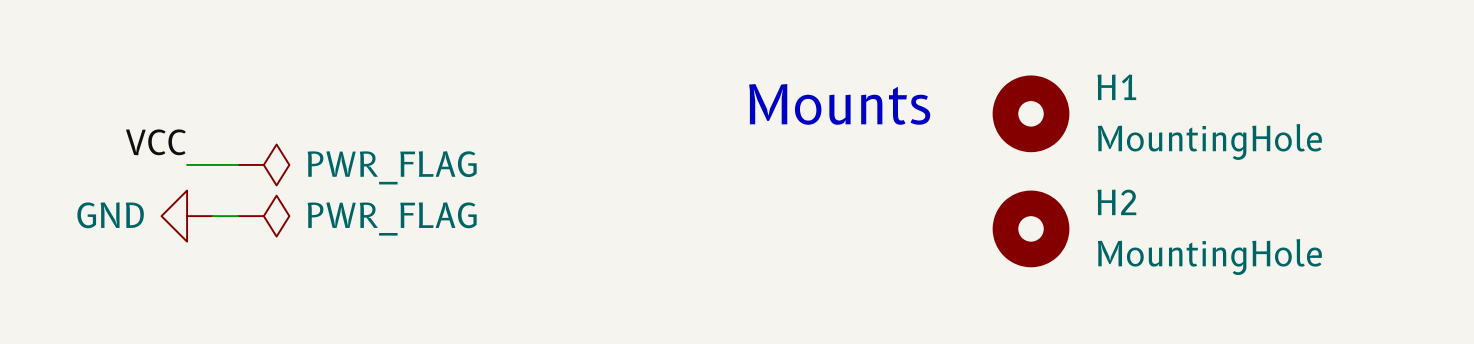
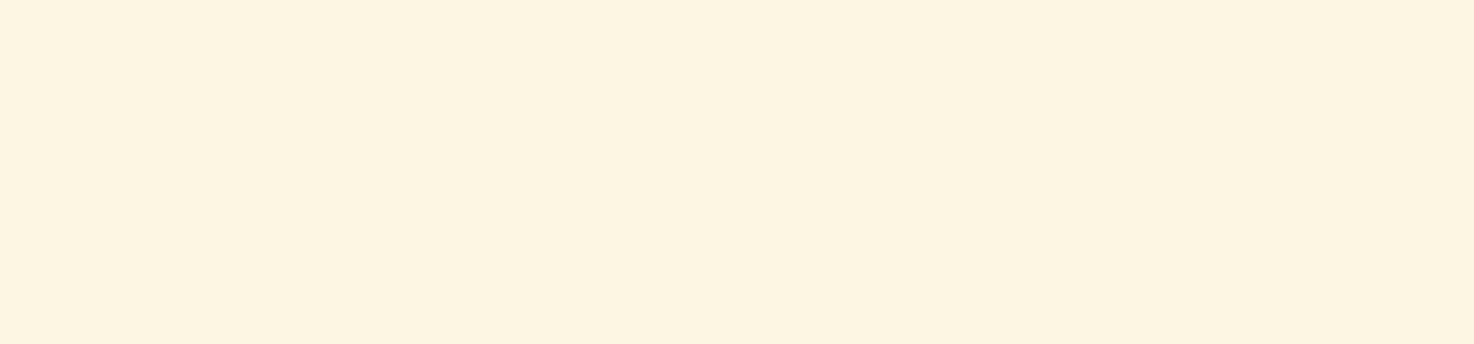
text: Mounts (839, 104) -> none
H1: MountingHole (1031, 113) -> none
label: VCC (155, 142) -> none
wire: (187, 164) (238, 164) -> none
power symbol: PWR_FLAG (263, 164) -> none
power symbol: GND (187, 216) -> none
wire: (212, 216) (238, 216) -> none
power symbol: PWR_FLAG (263, 216) -> none
H2: MountingHole (1031, 228) -> none

